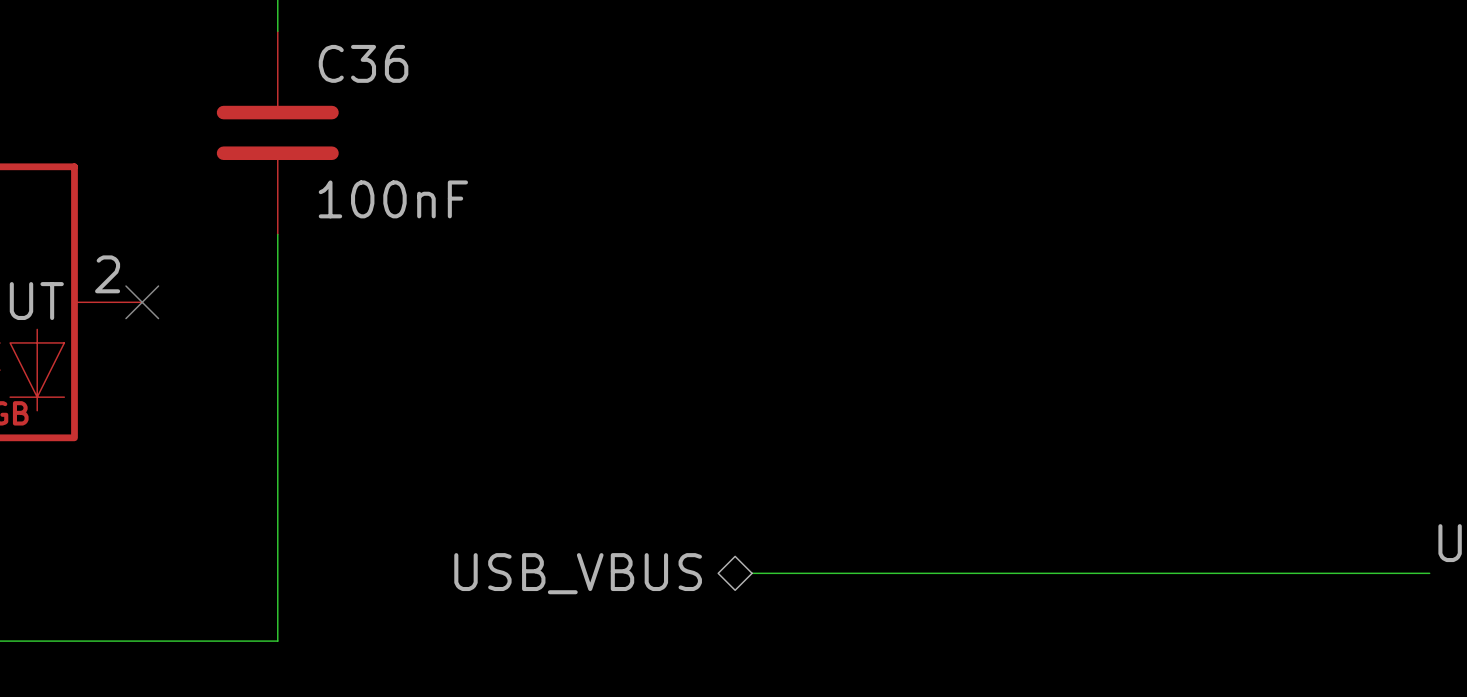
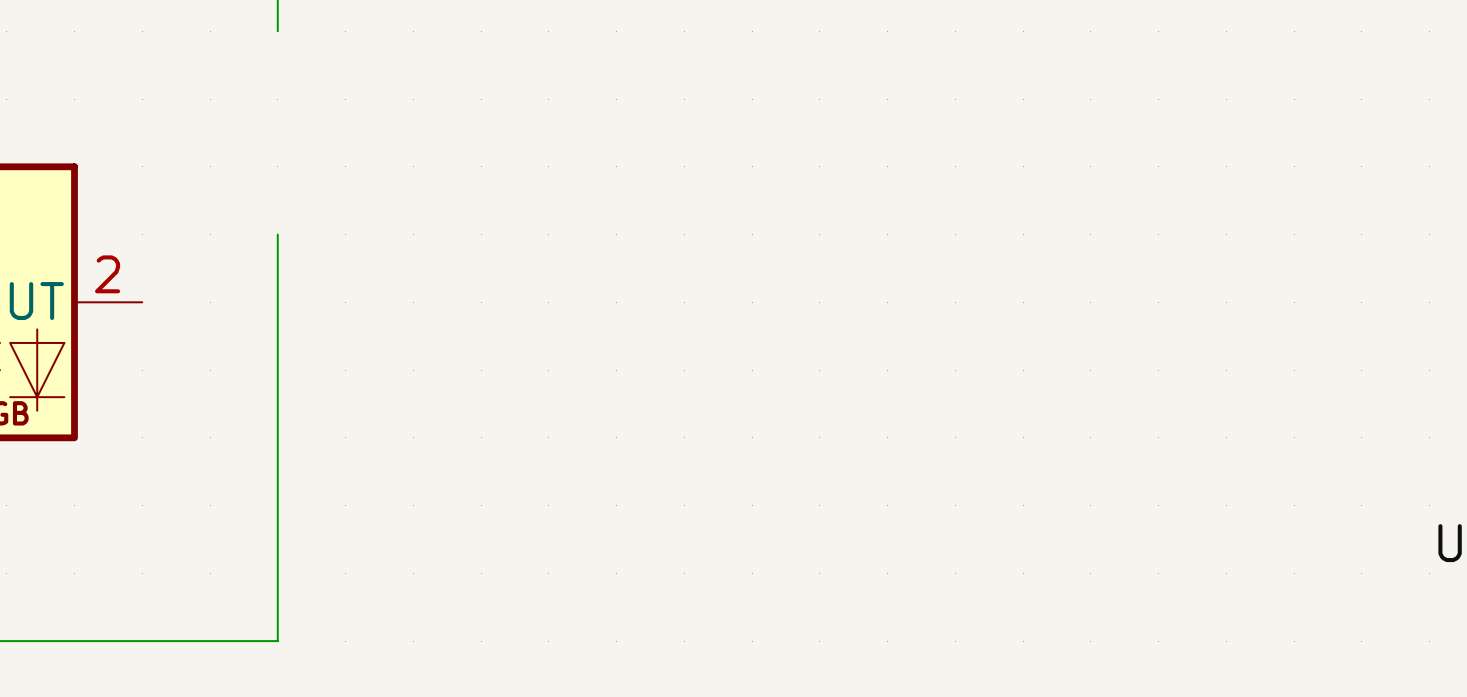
C36: 100nF (277, 132) -> none
no-connect mark: (142, 302) -> none
hierarchical label: USB_VBUS (578, 573) -> none
wire: (752, 573) (1429, 573) -> none

